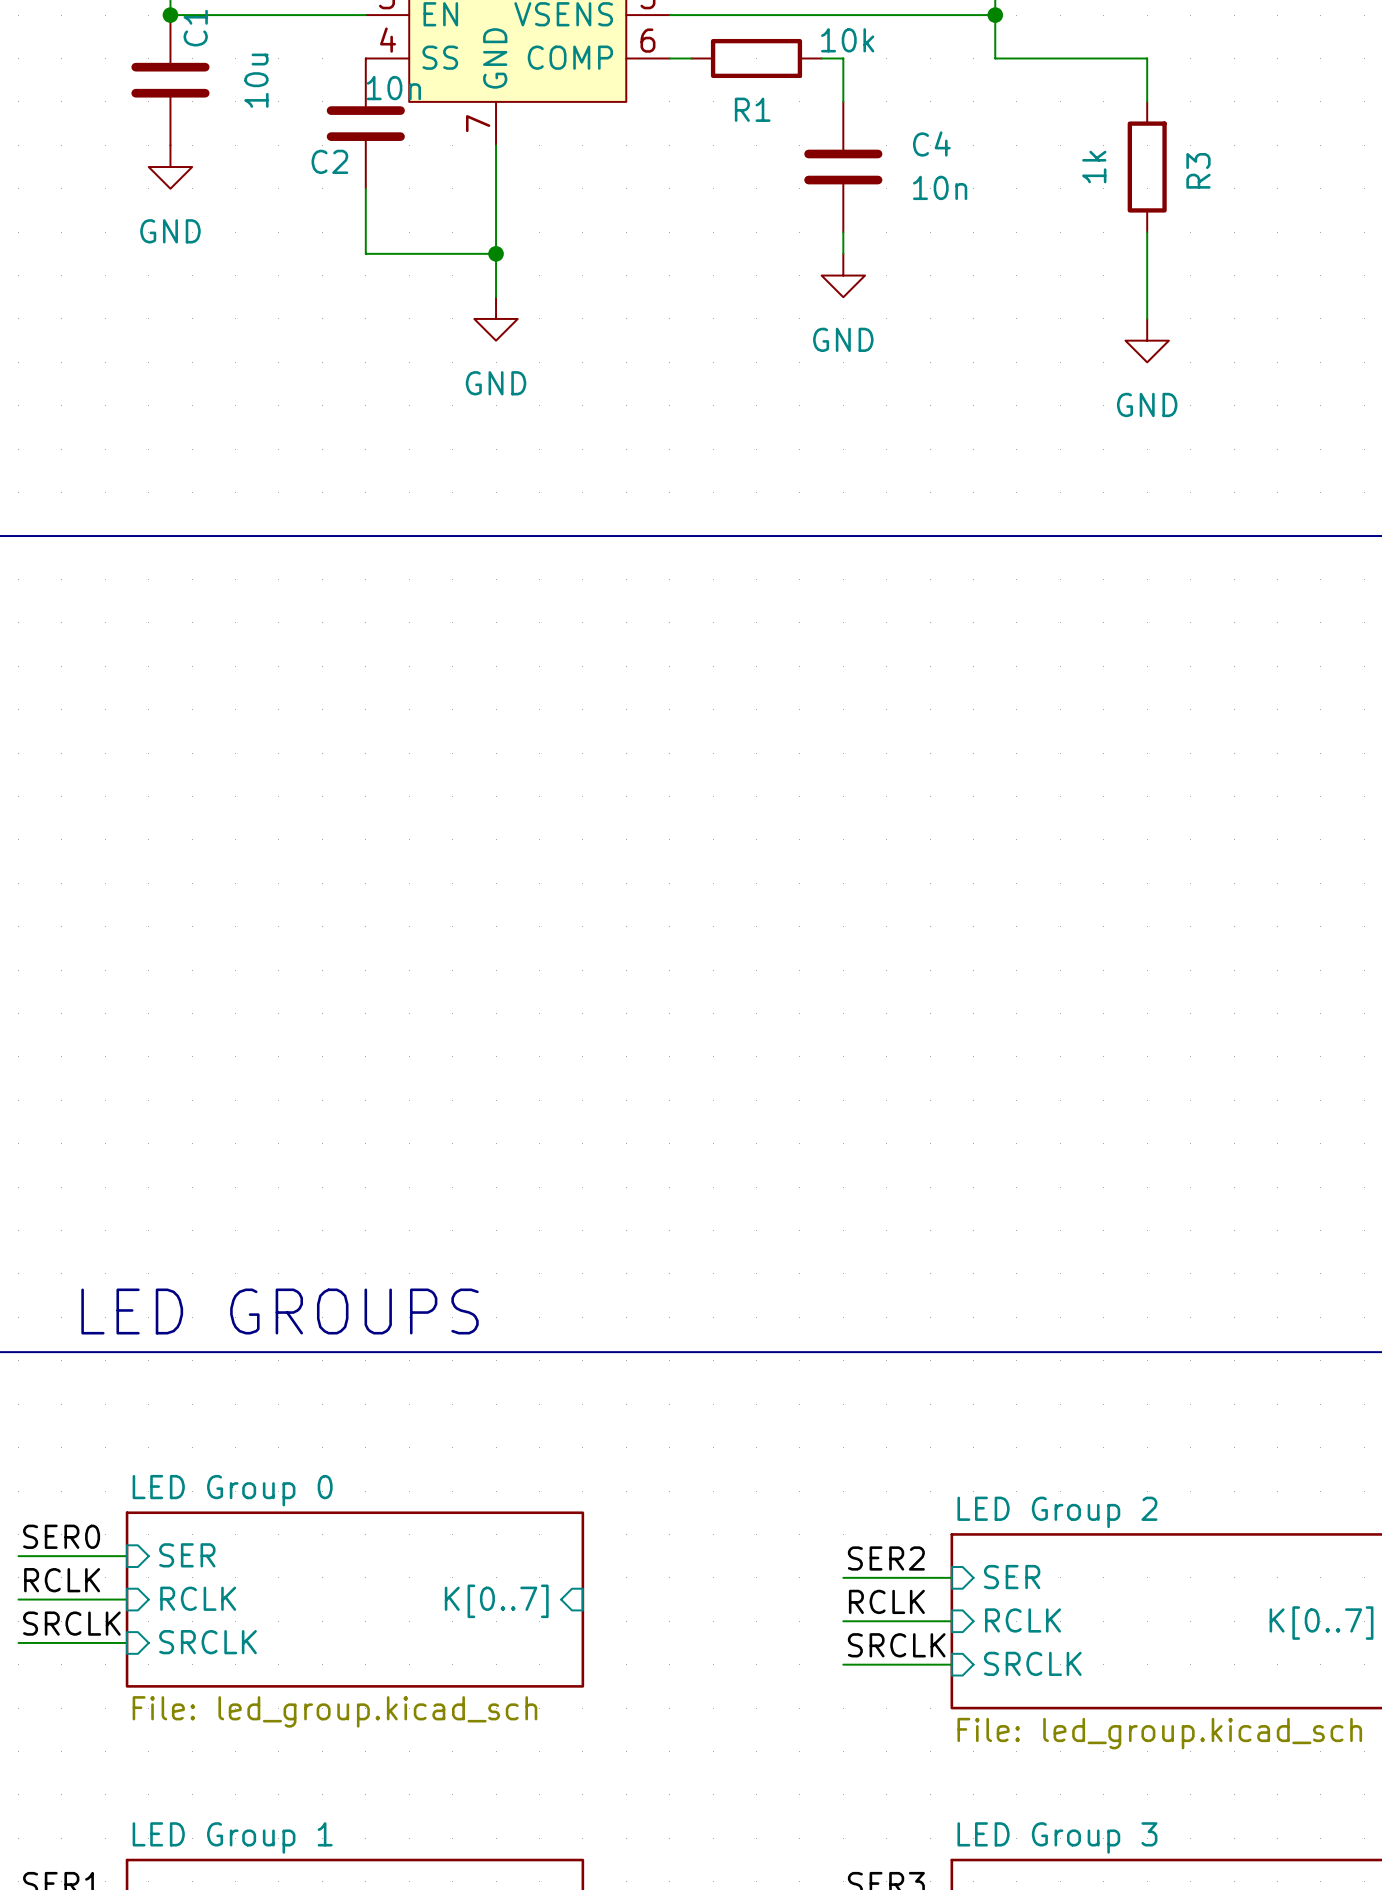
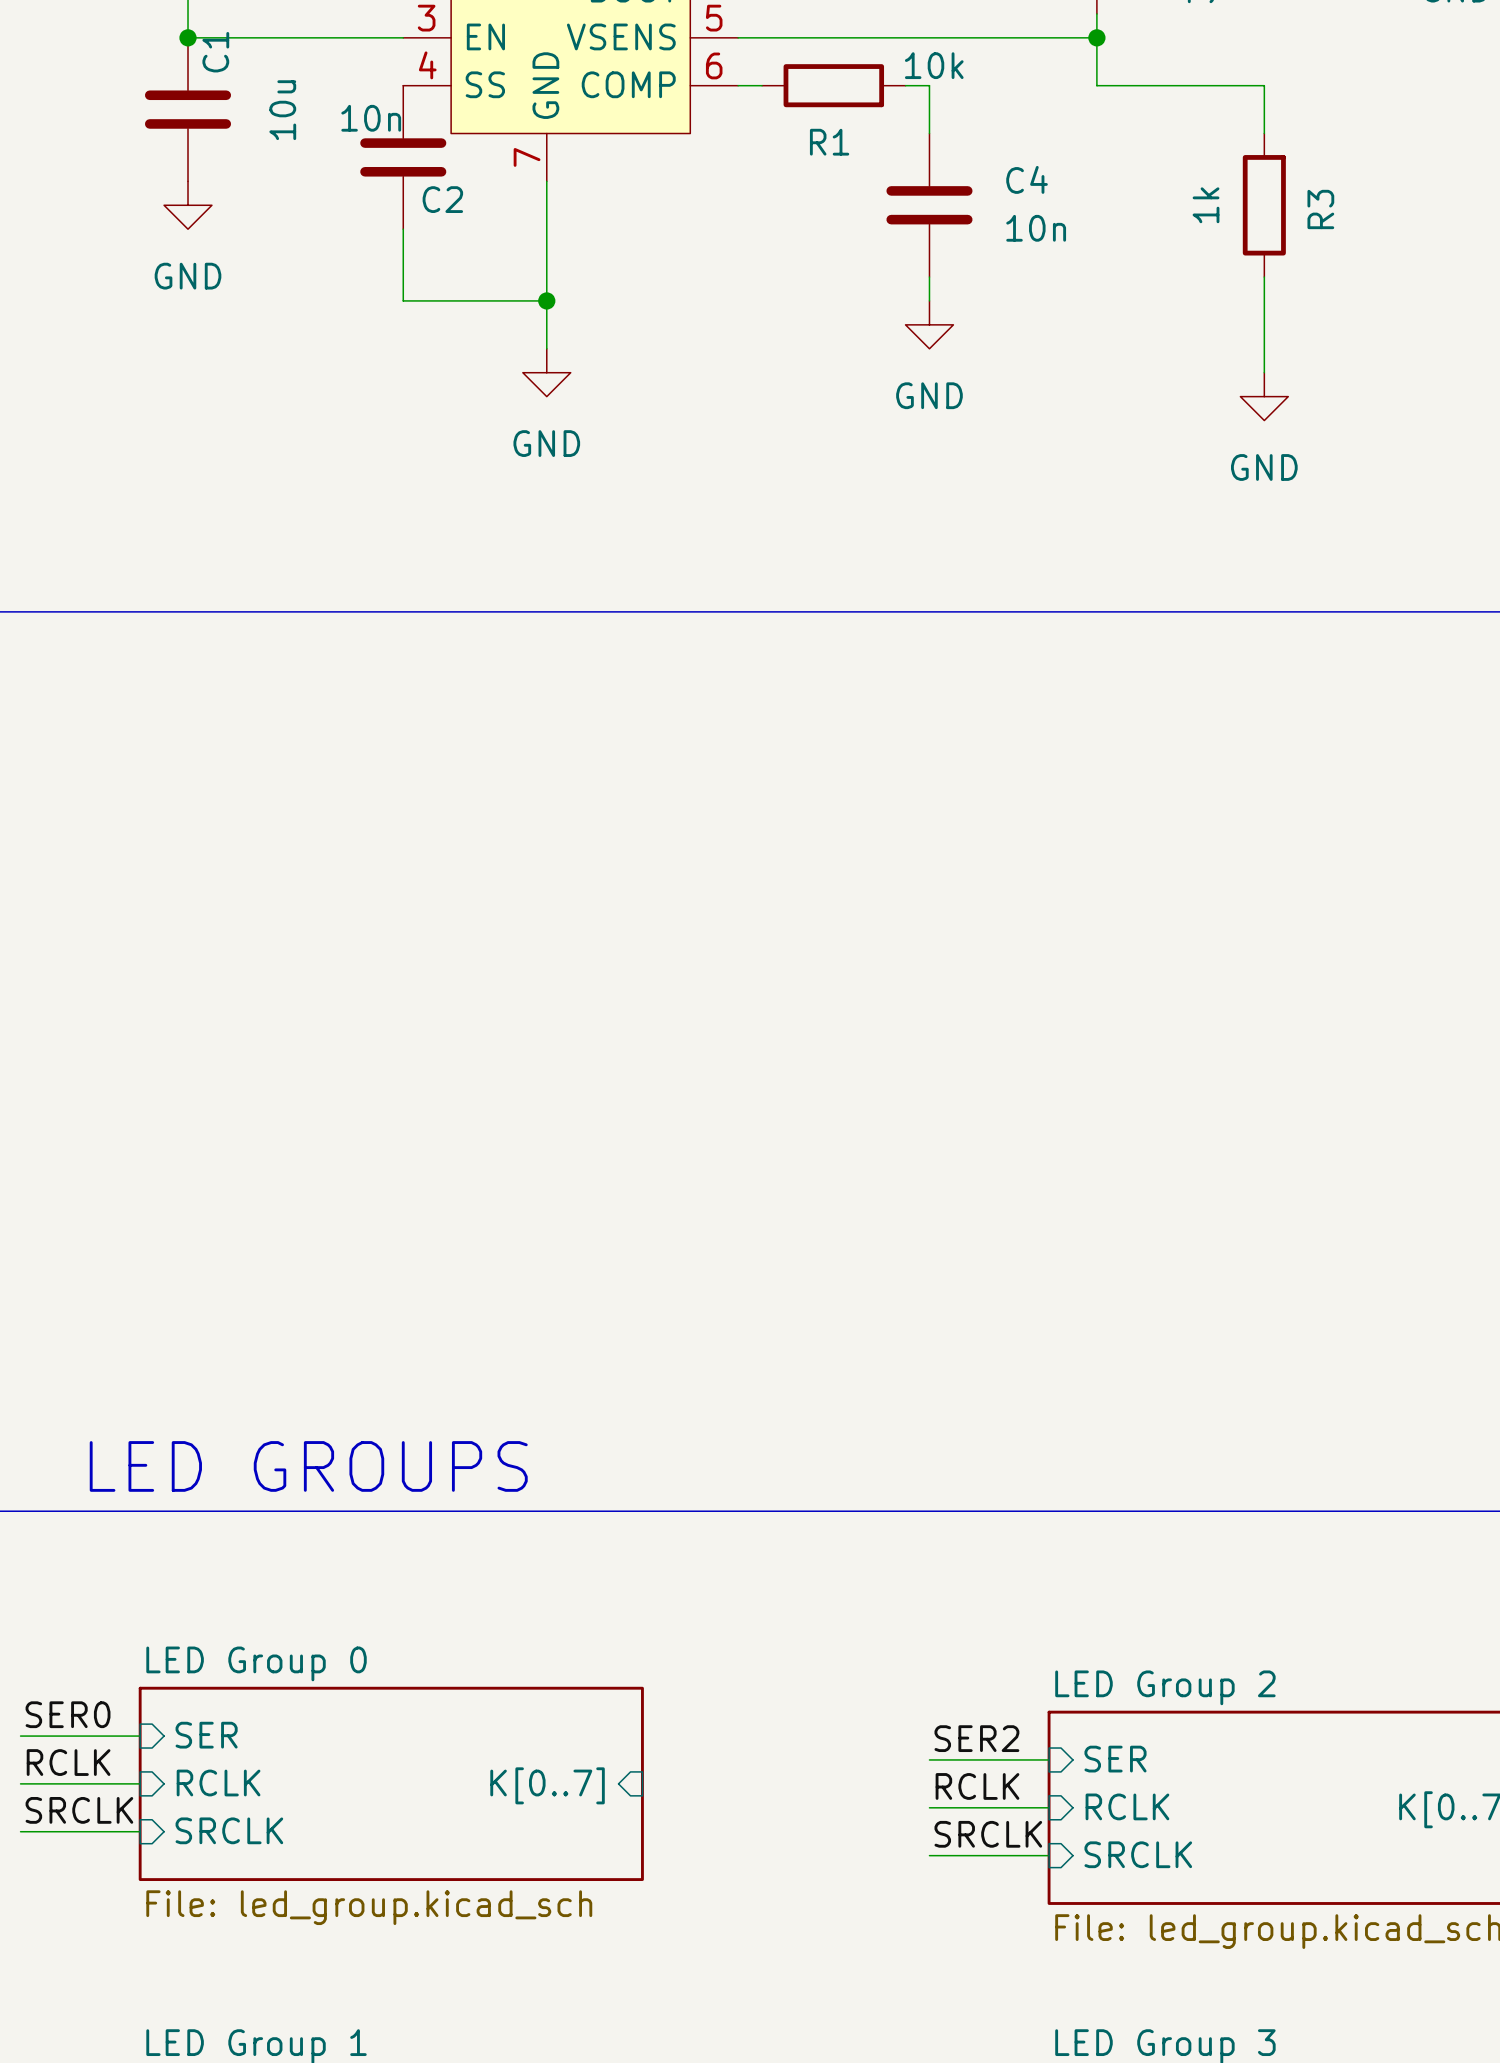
C2 value position: 10n (393, 88) -> 10n (371, 118)
C2 name position: C2 (329, 161) -> C2 (442, 199)

